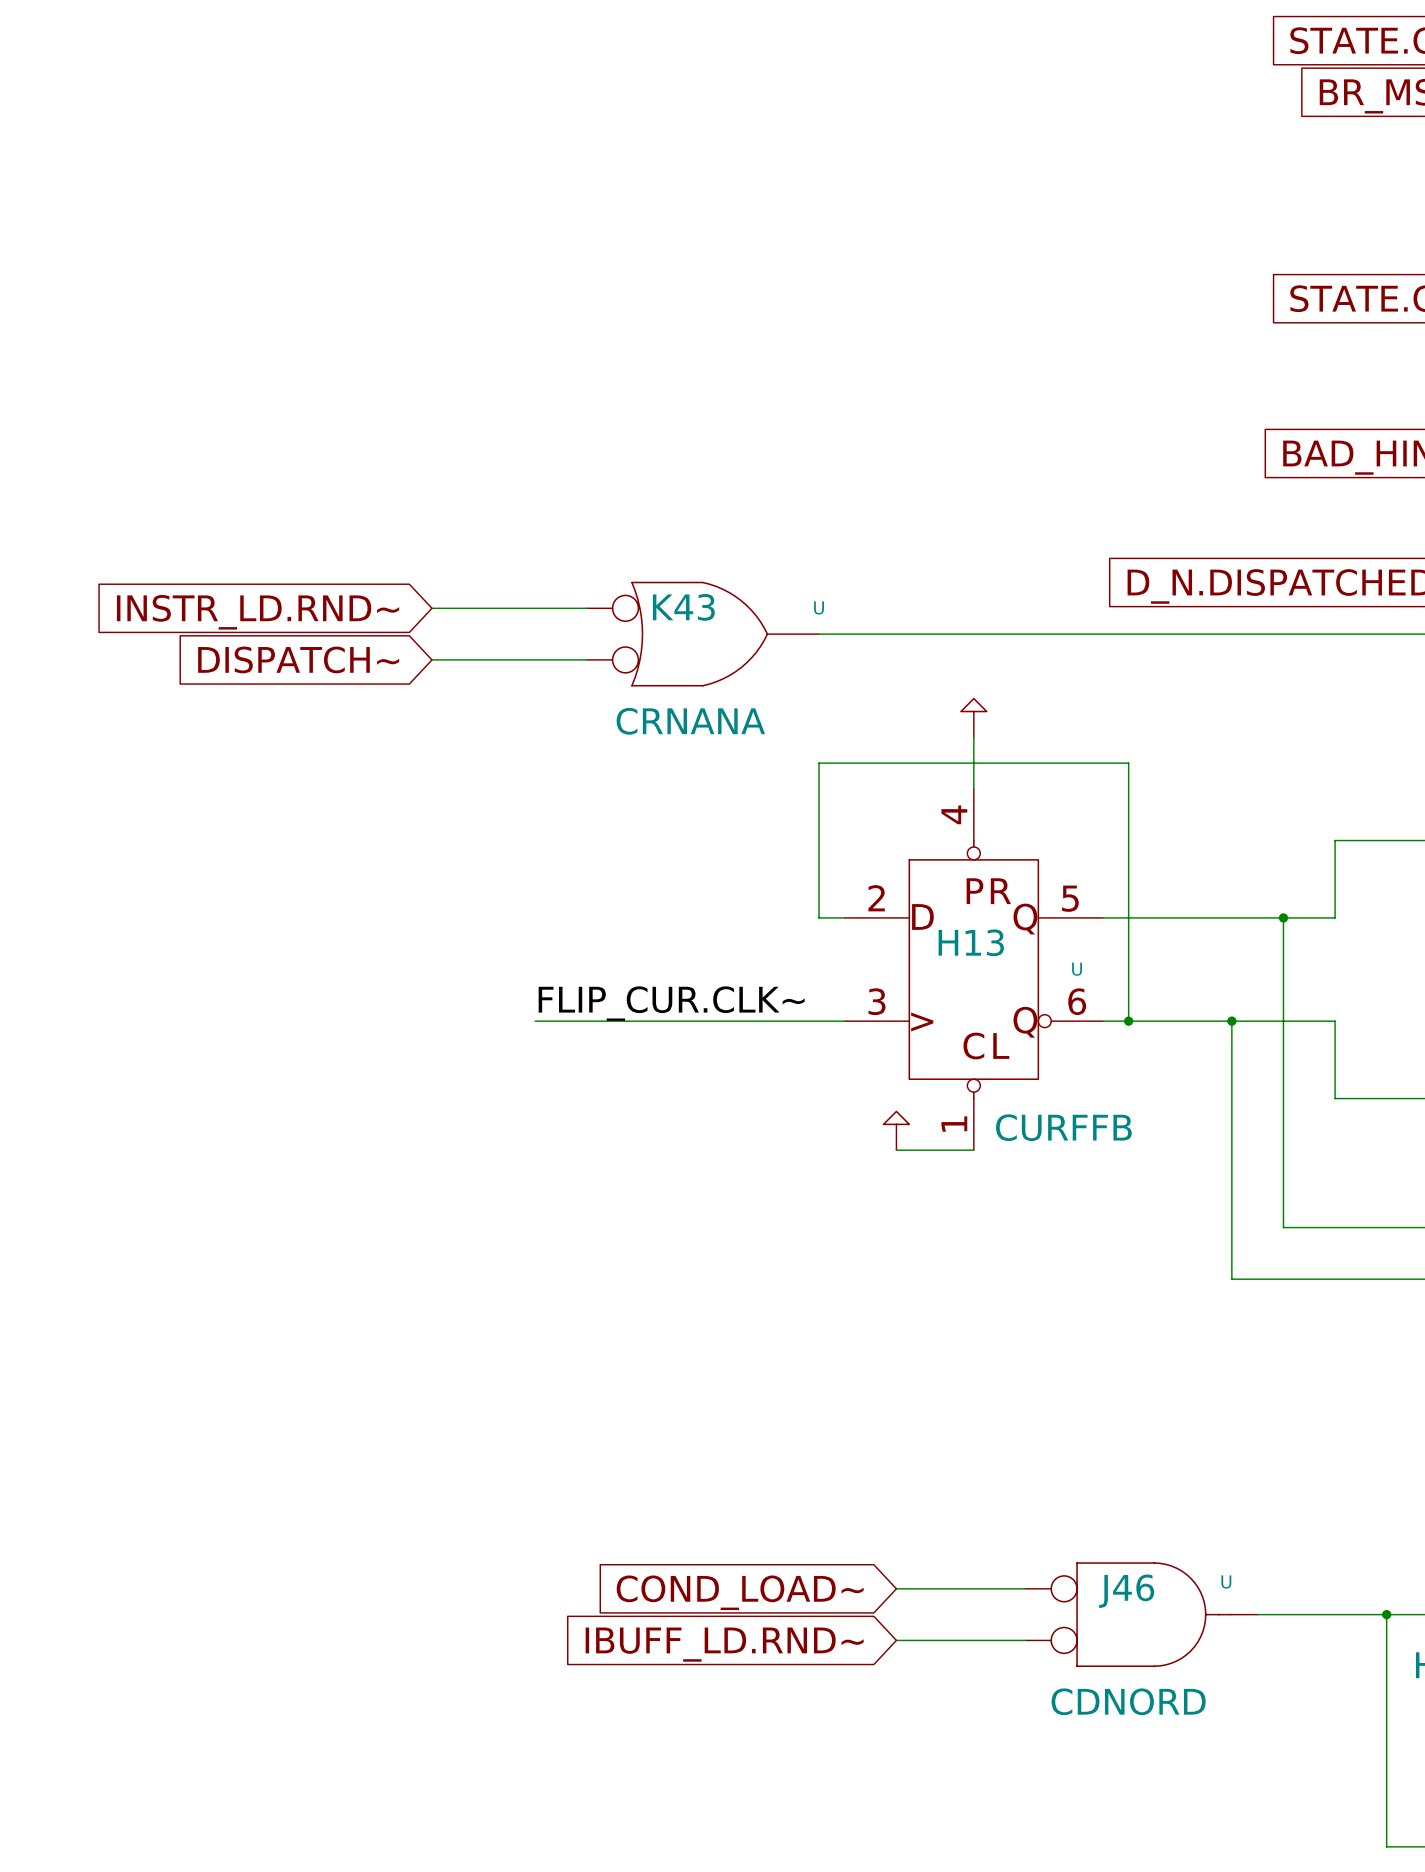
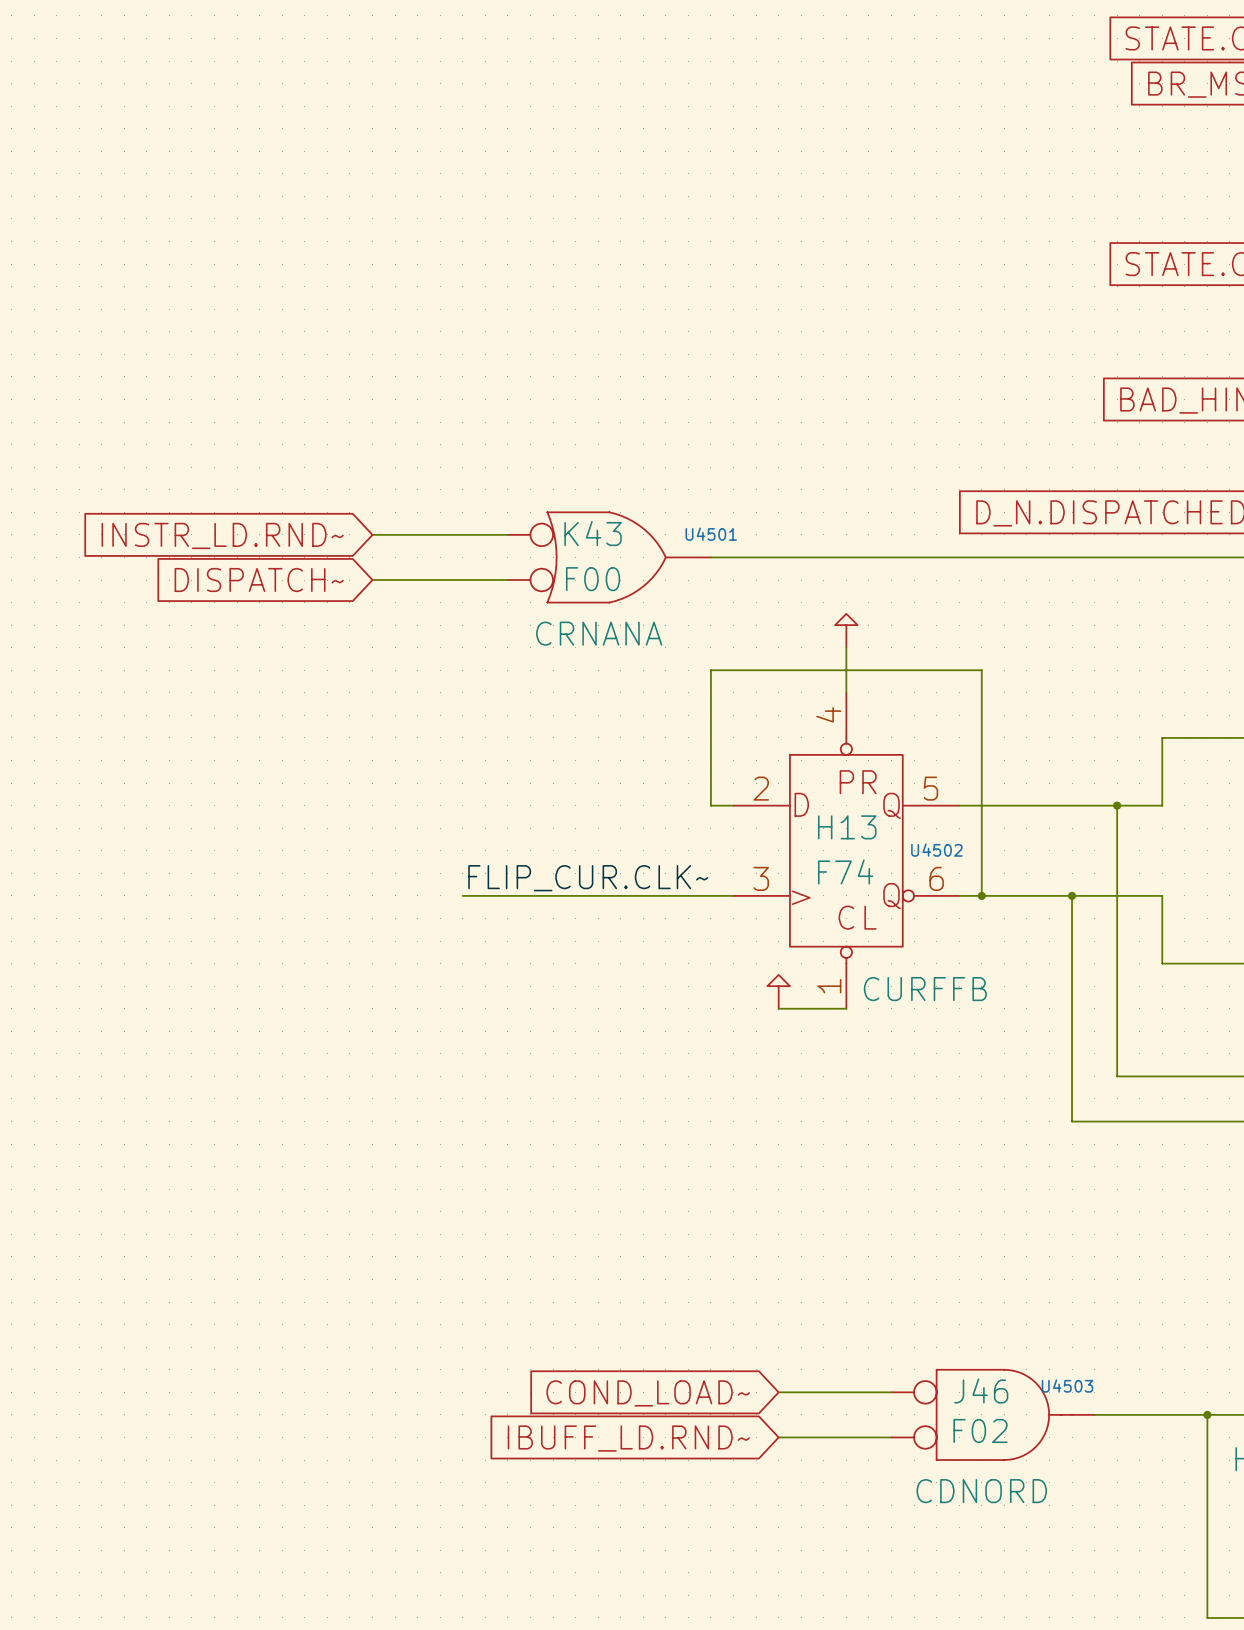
U name: U (819, 607) -> U4501 (711, 534)
U value: none -> F00 (593, 579)
U name: U (1077, 969) -> U4502 (936, 850)
U value: none -> F74 (845, 871)
U name: U (1226, 1582) -> U4503 (1067, 1386)
U value: none -> F02 (980, 1430)

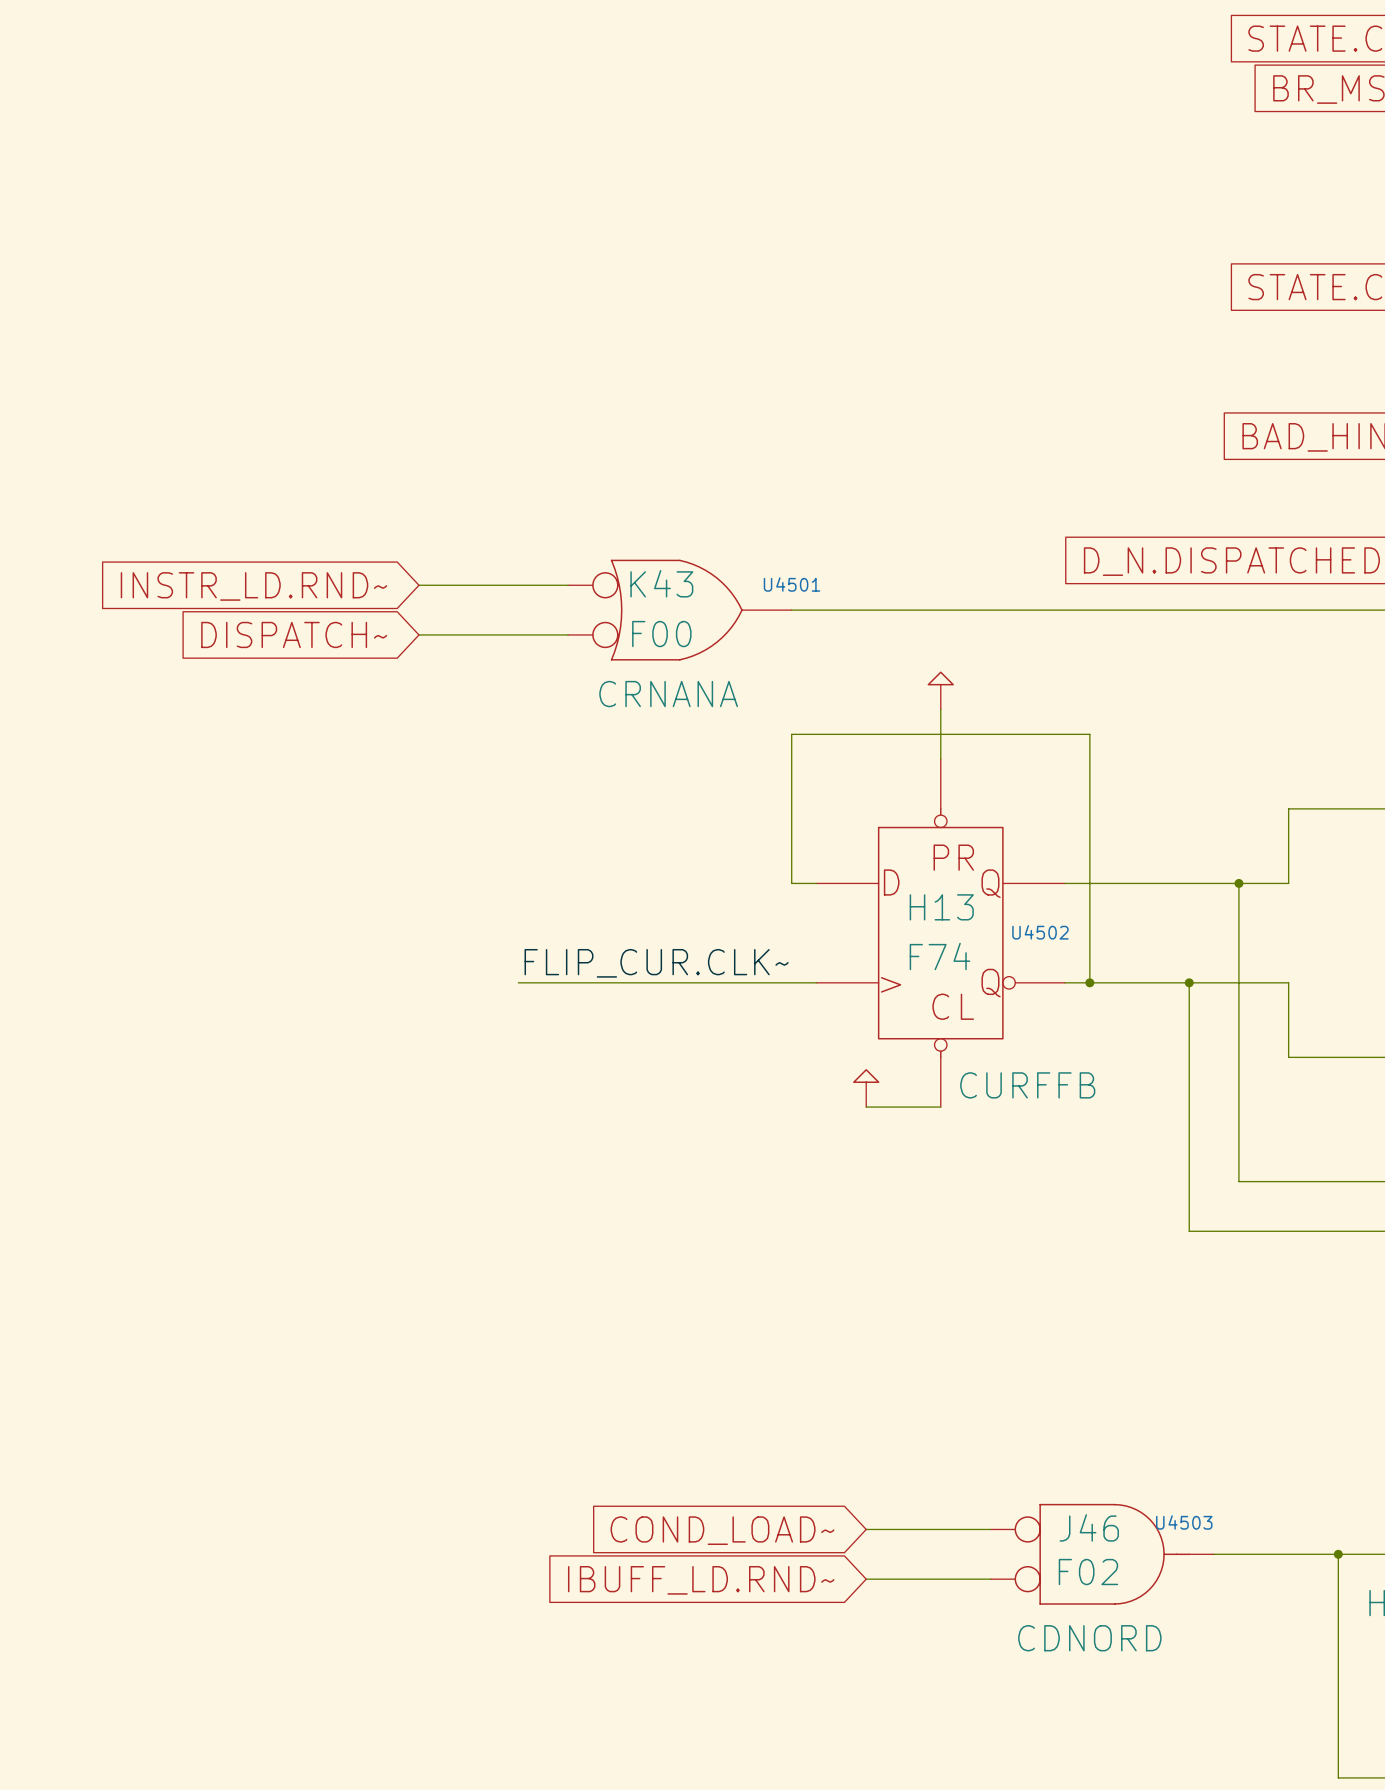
U4502 pin number: 4 (828, 714) -> none
U4502 pin number: 2 (761, 788) -> none
U4502 pin number: 5 (930, 788) -> none
U4502 pin number: 3 (761, 878) -> none
U4502 pin number: 6 (936, 878) -> none
U4502 pin number: 1 (829, 986) -> none

